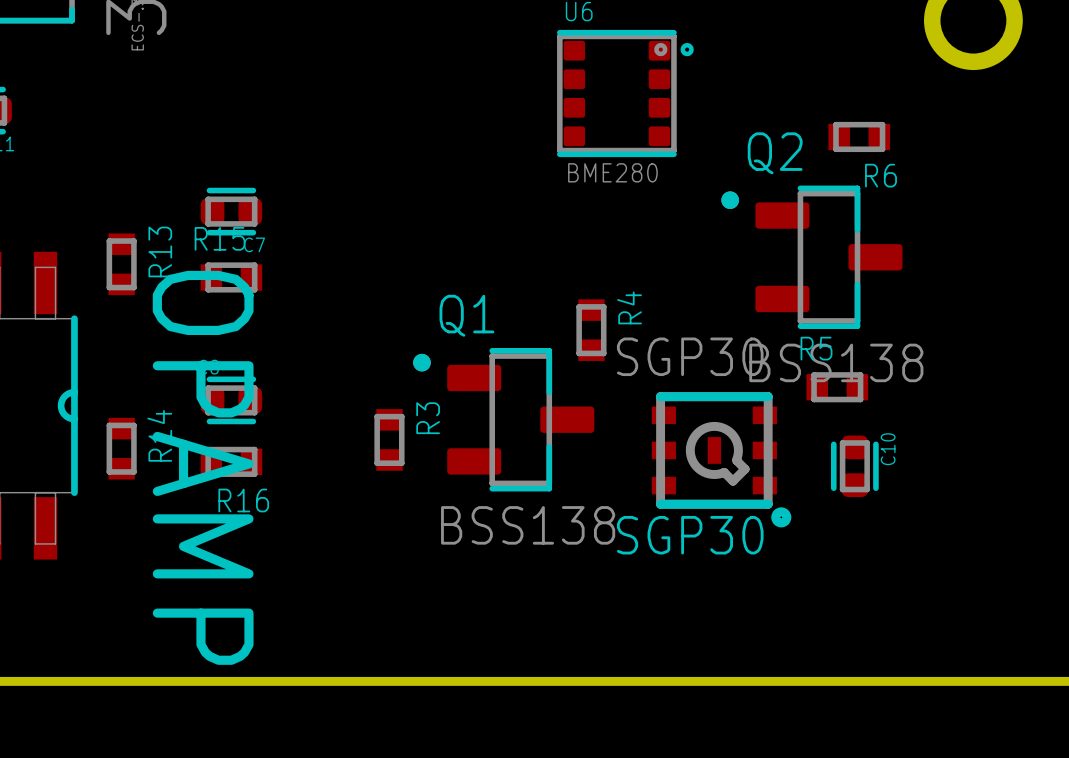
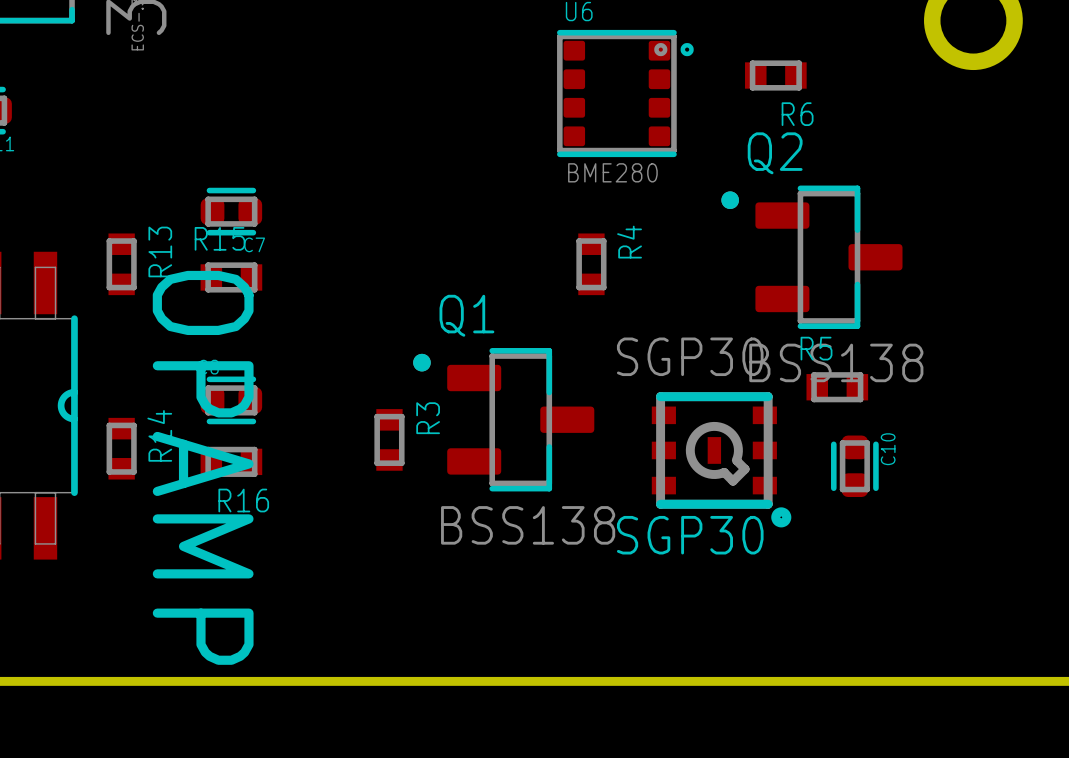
R6 position: (859, 136) -> (775, 75)
R4 position: (591, 330) -> (591, 264)

